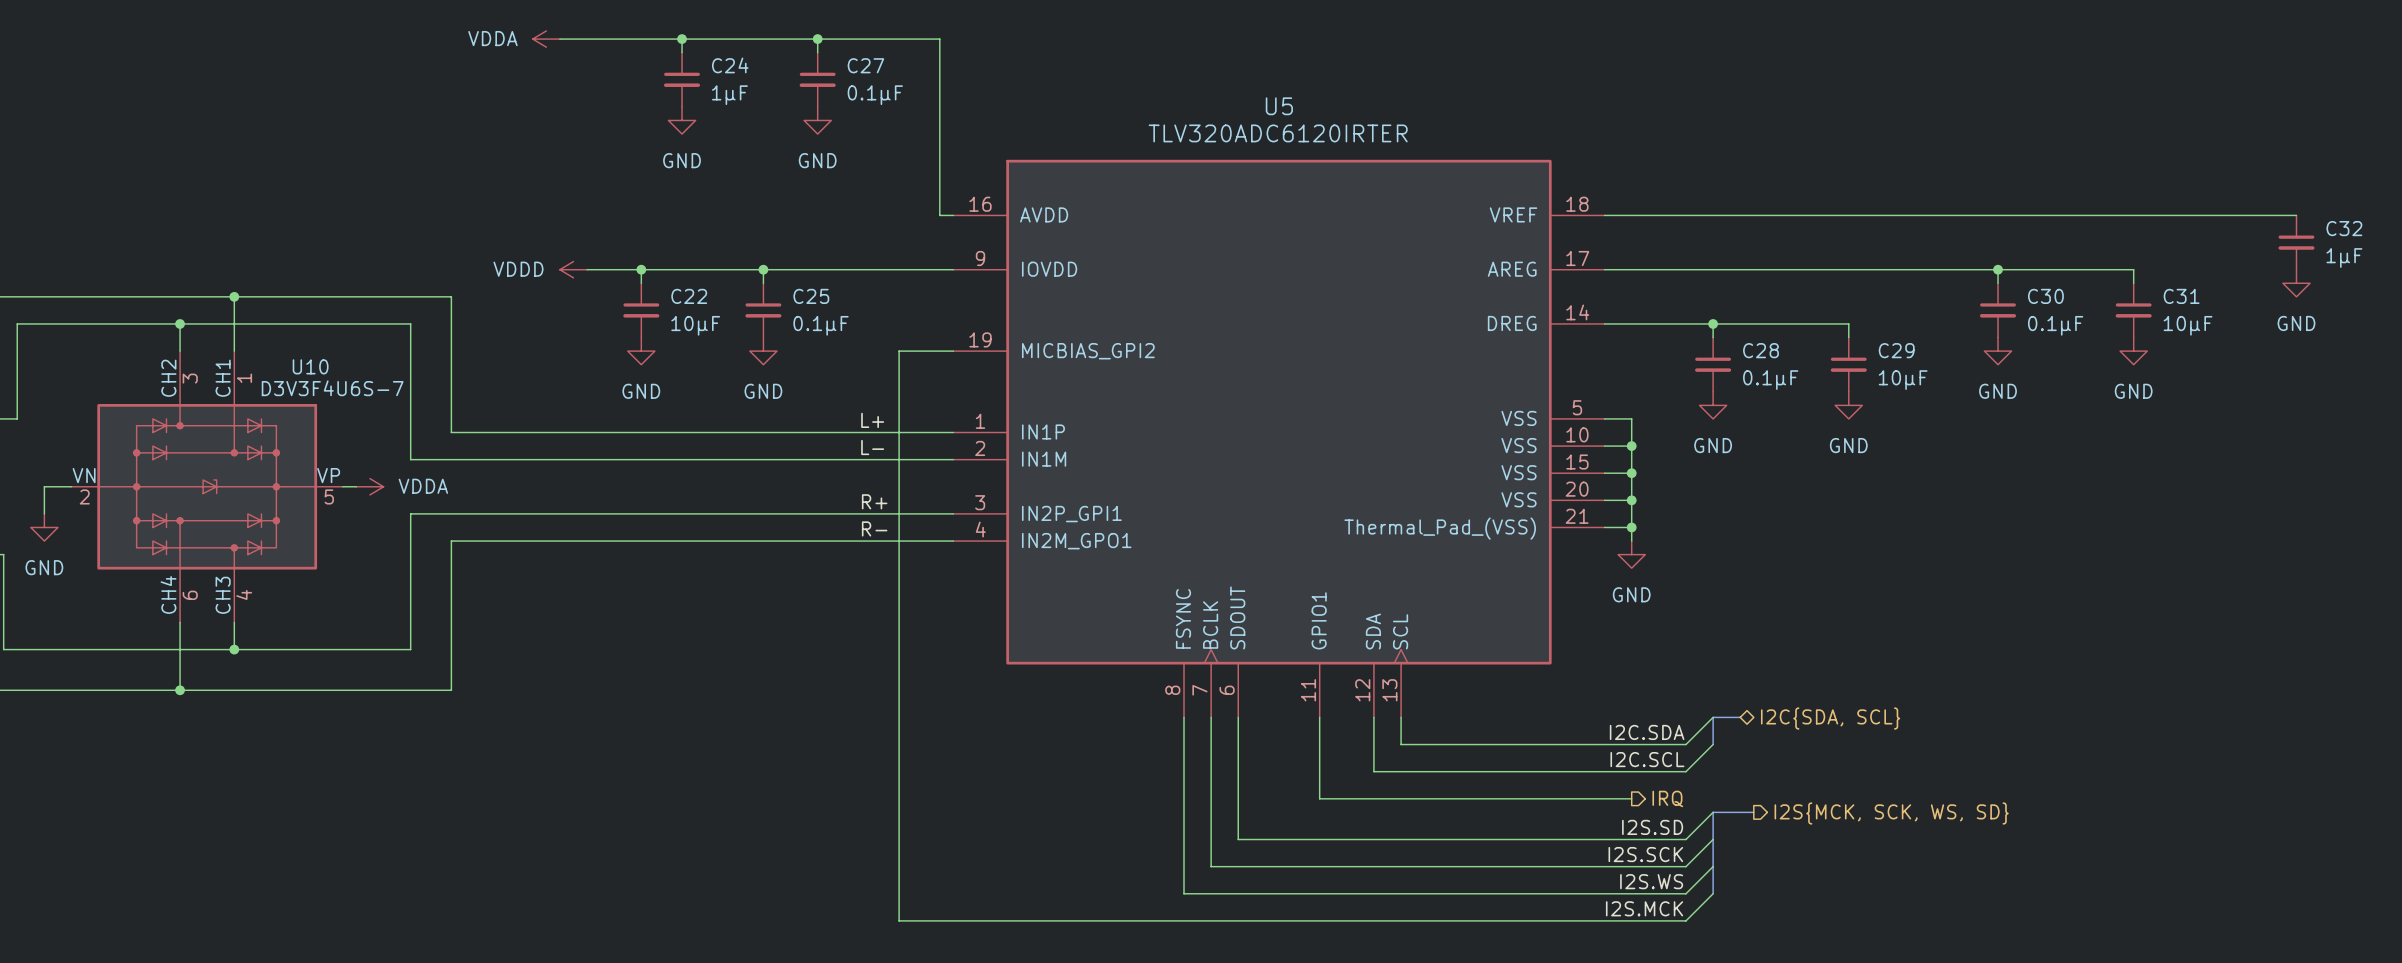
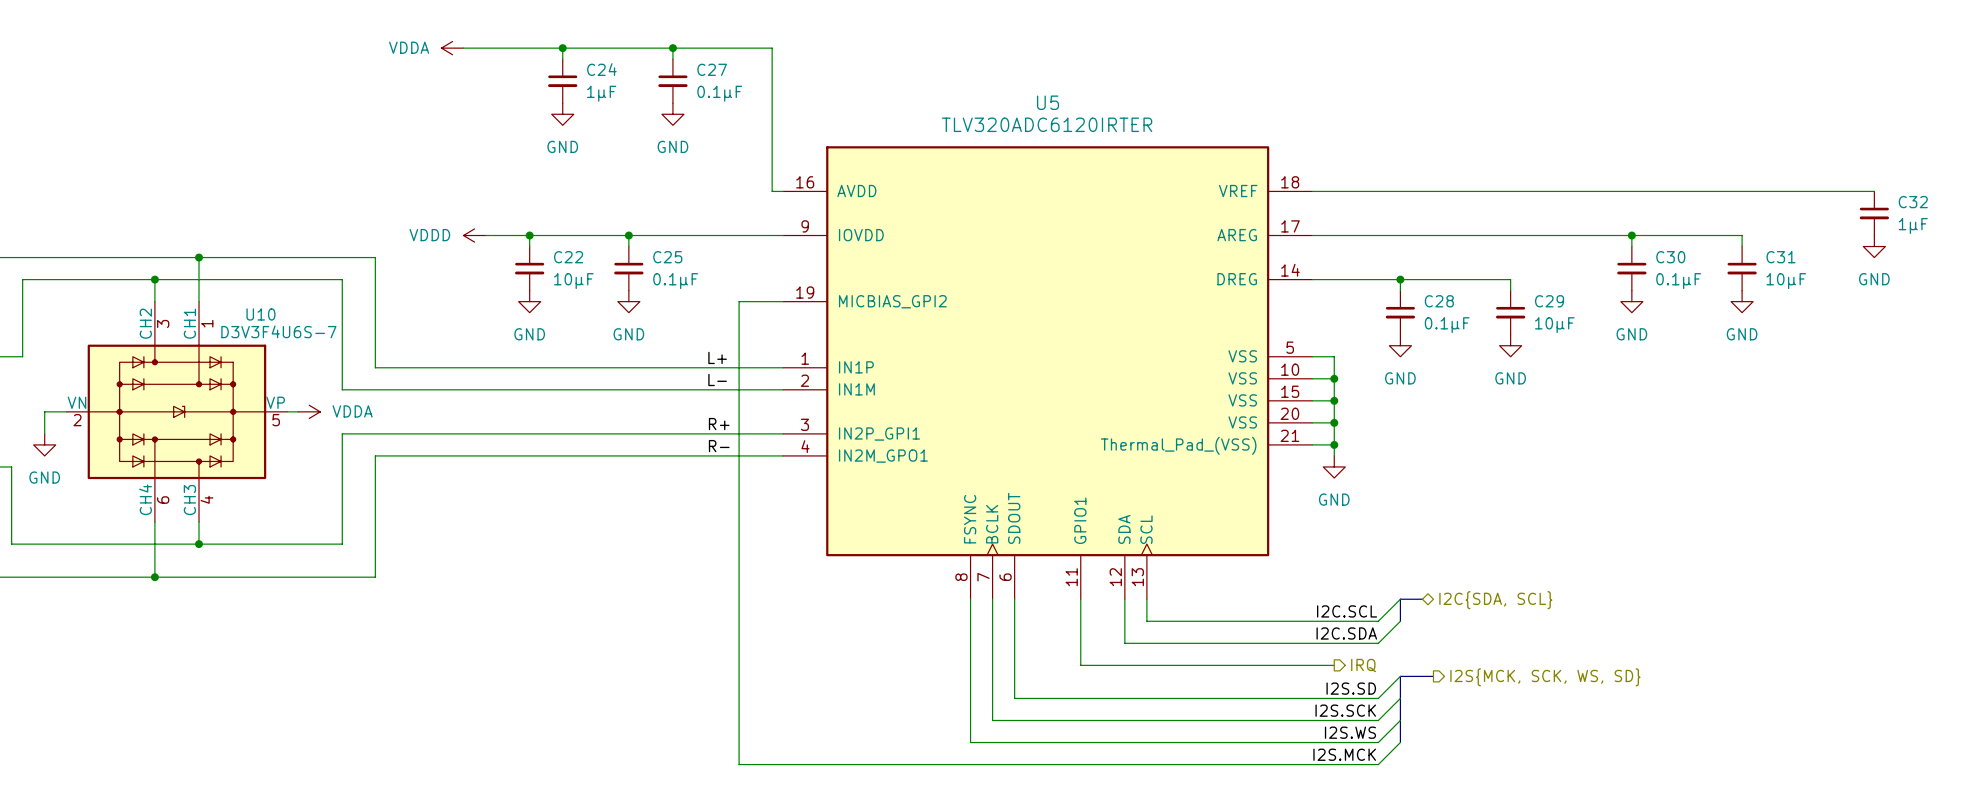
label: I2C.SDA (1647, 732) -> I2C.SCL (1347, 611)
label: I2C.SCL (1647, 759) -> I2C.SDA (1346, 633)

